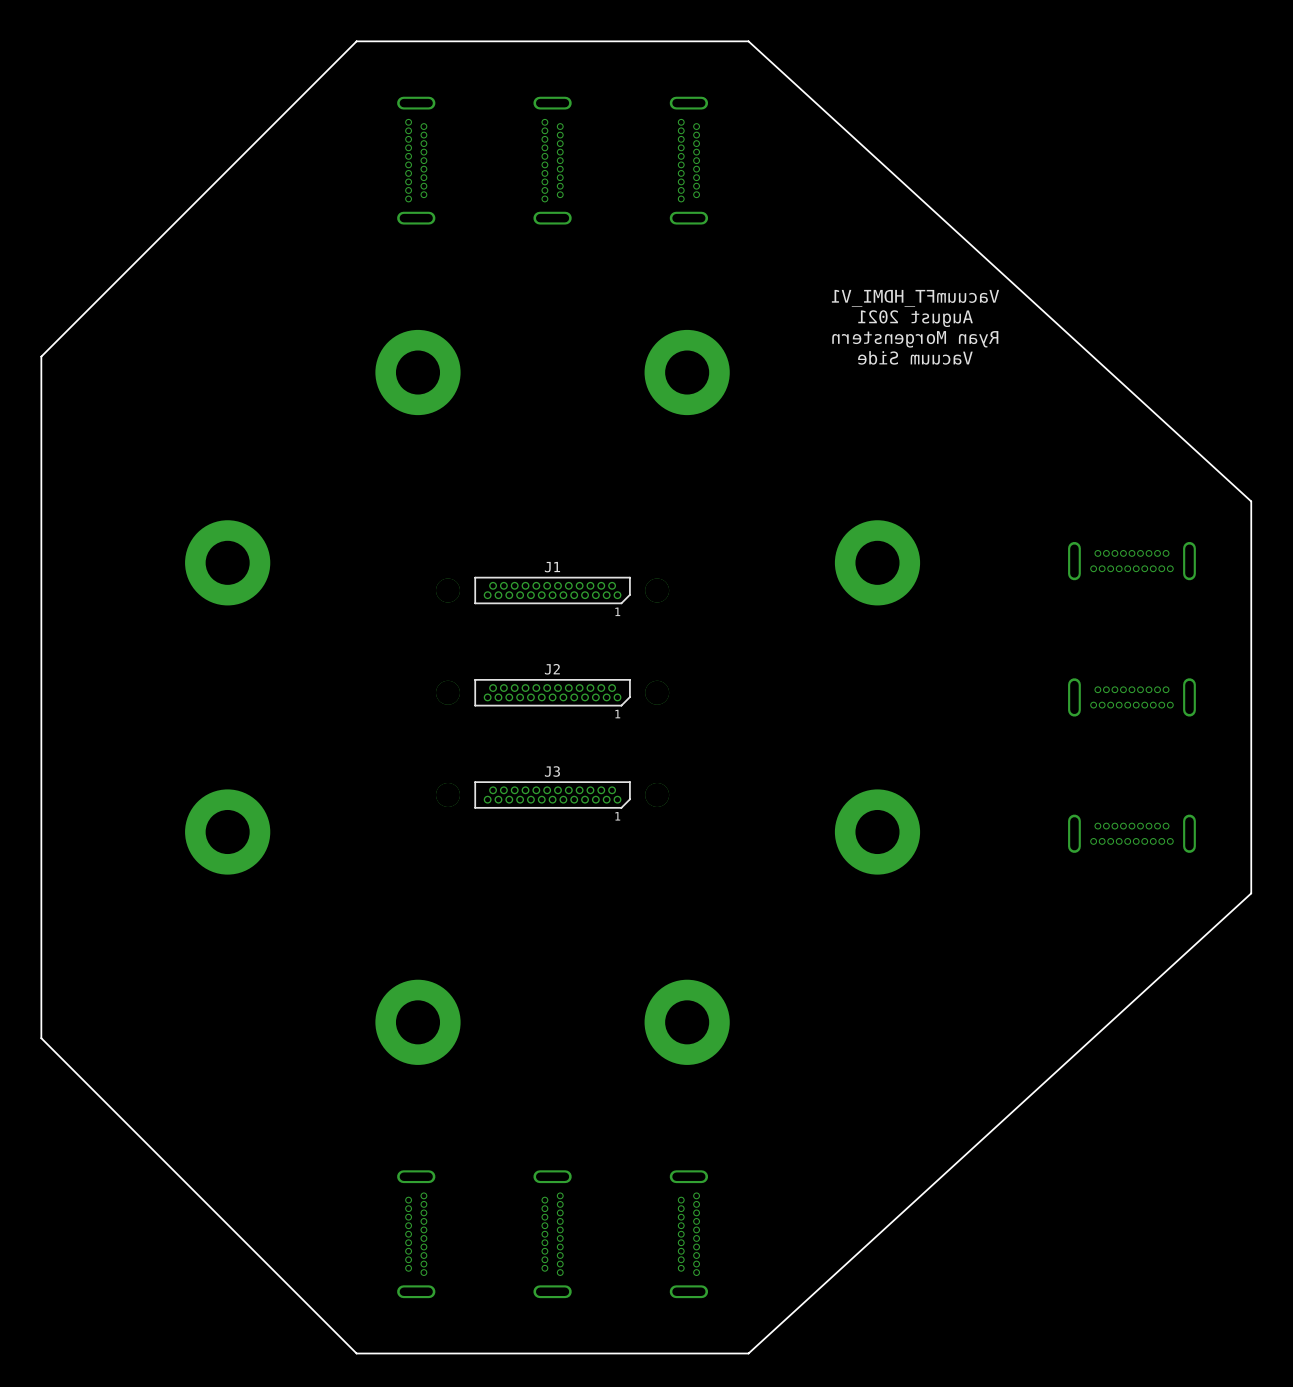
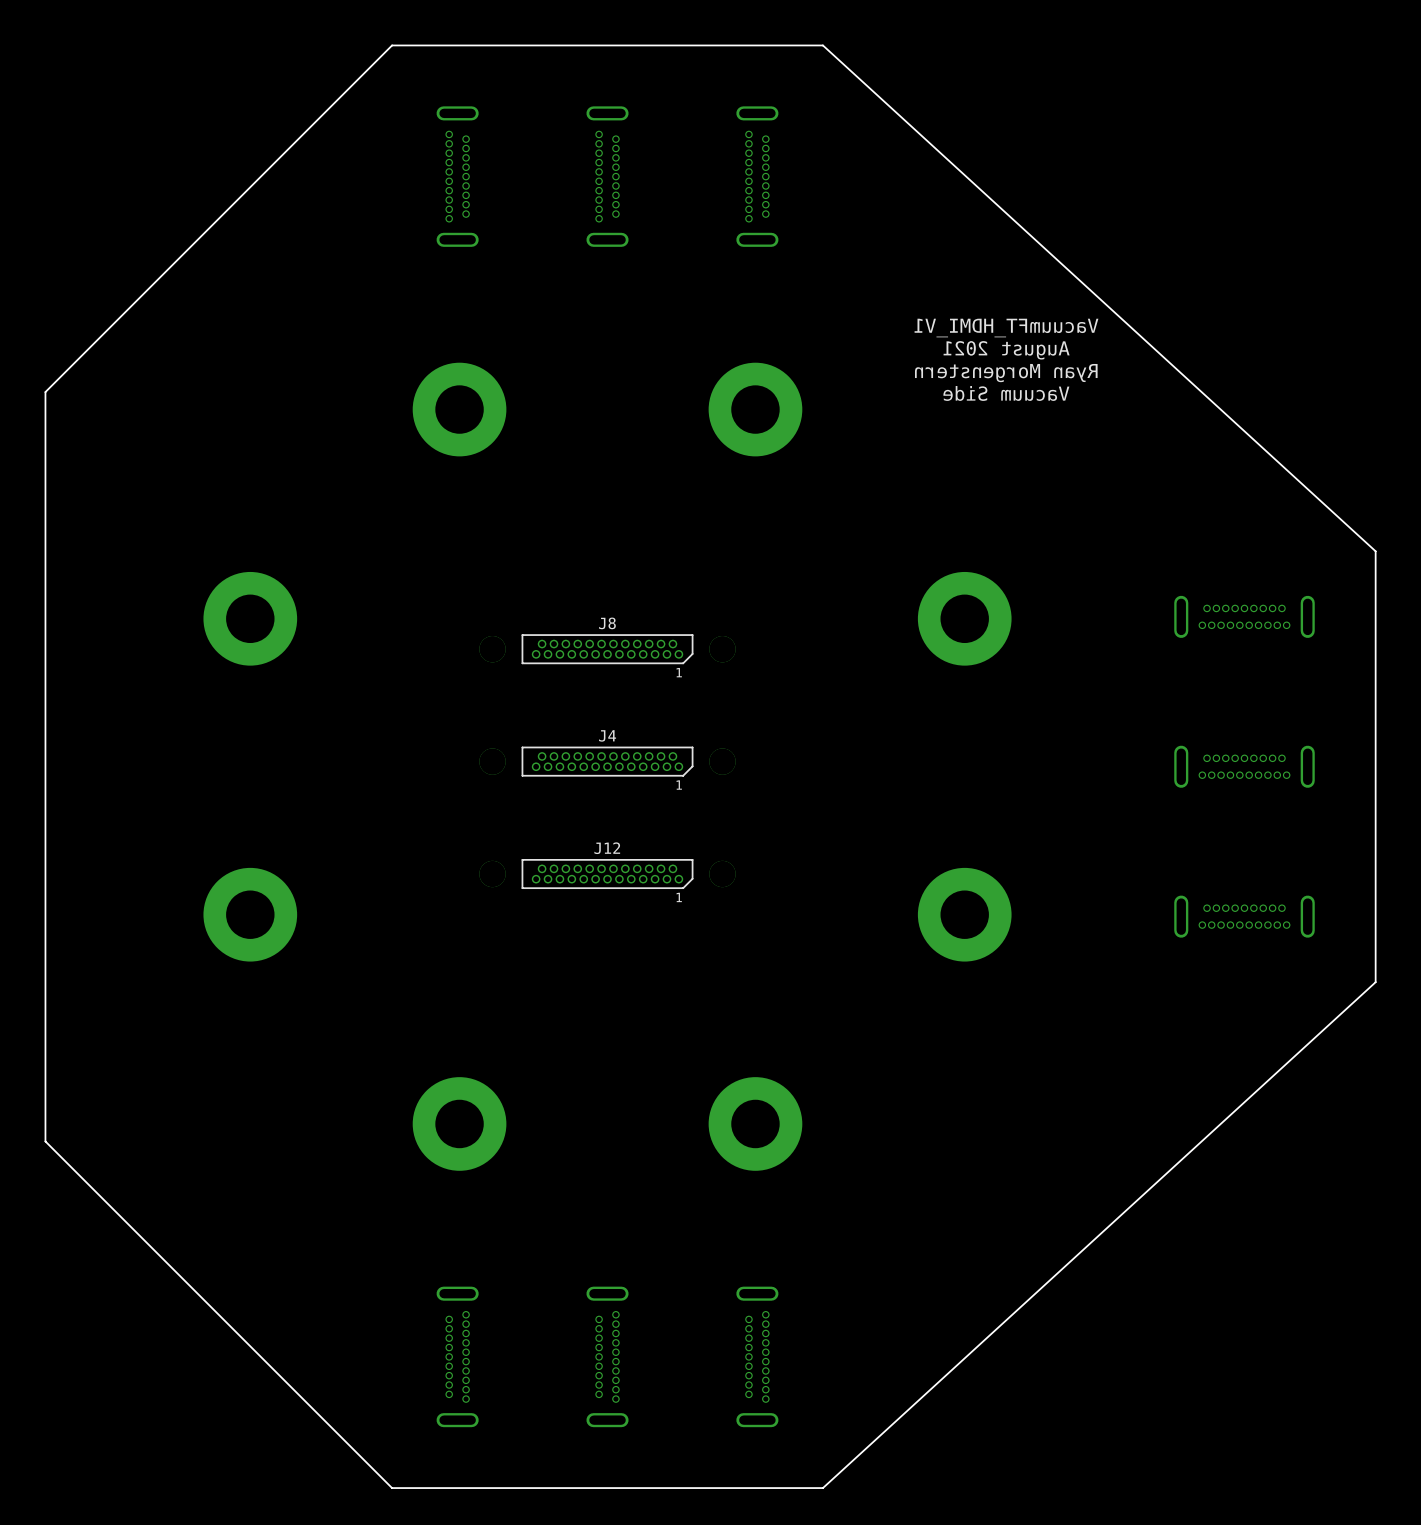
J1 name: J1 (552, 567) -> J8 (607, 623)
J2 name: J2 (552, 669) -> J4 (607, 735)
J3 name: J3 (552, 771) -> J12 (607, 848)

